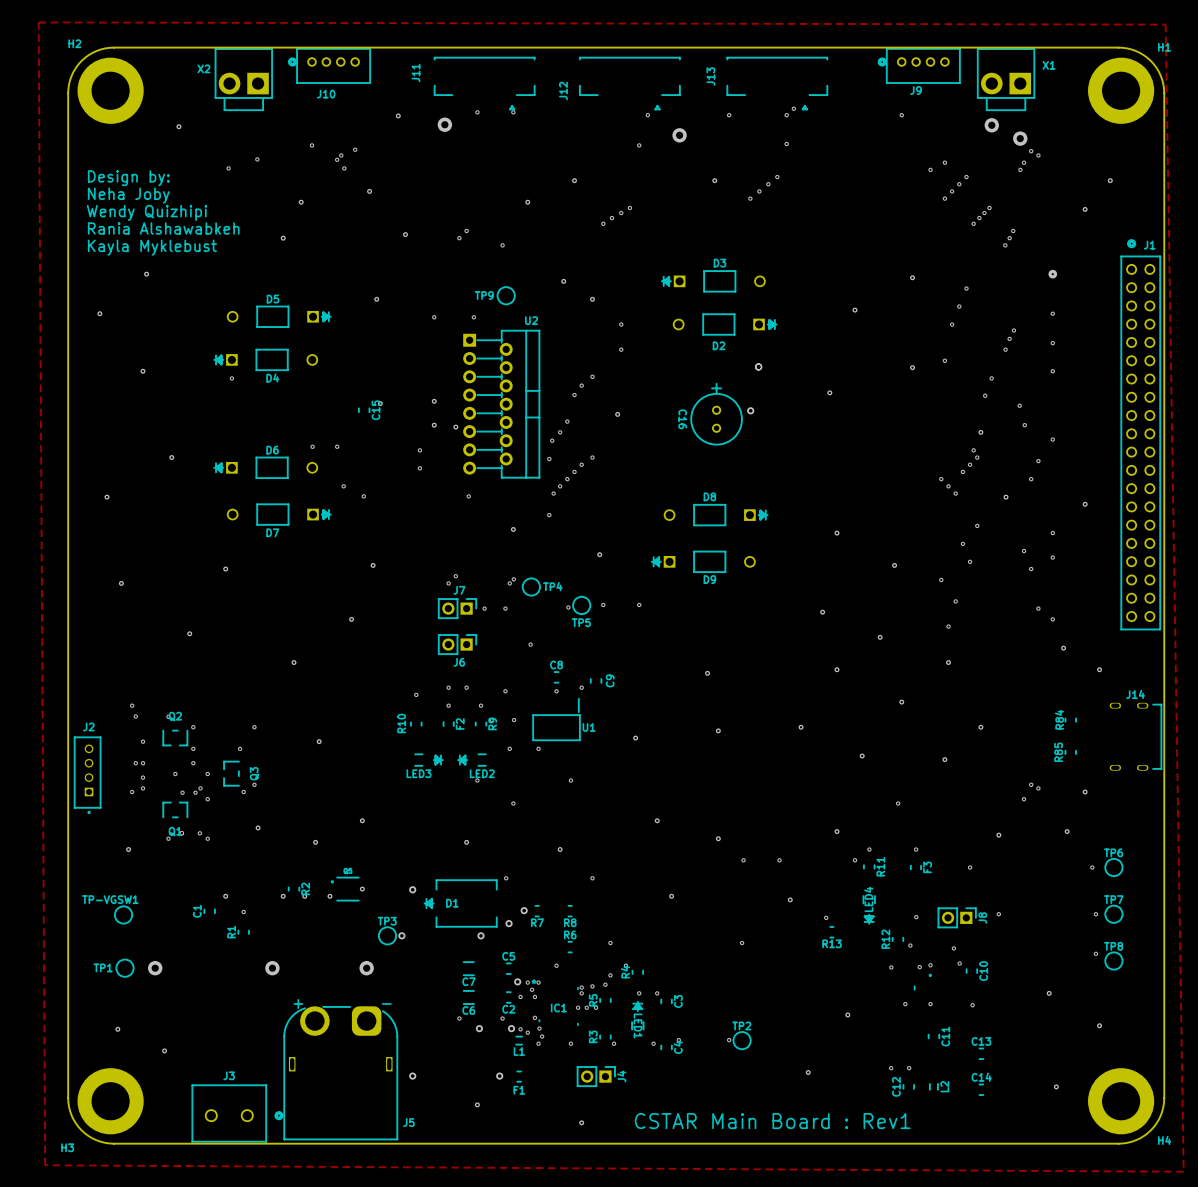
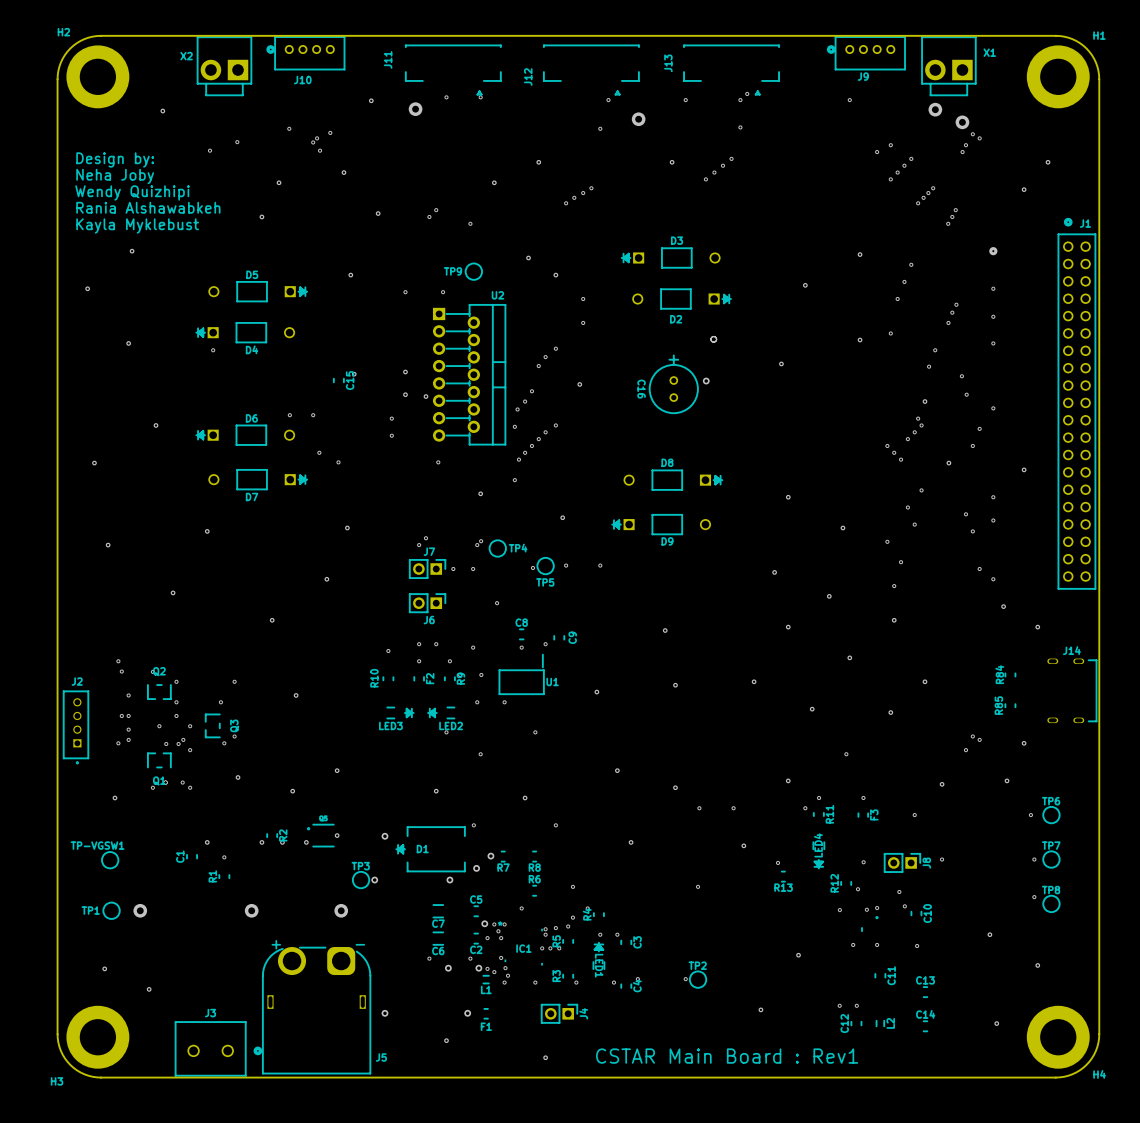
zone outline: (38, 22) (1165, 24) (1183, 1171) (45, 1165) (38, 22) -> none

